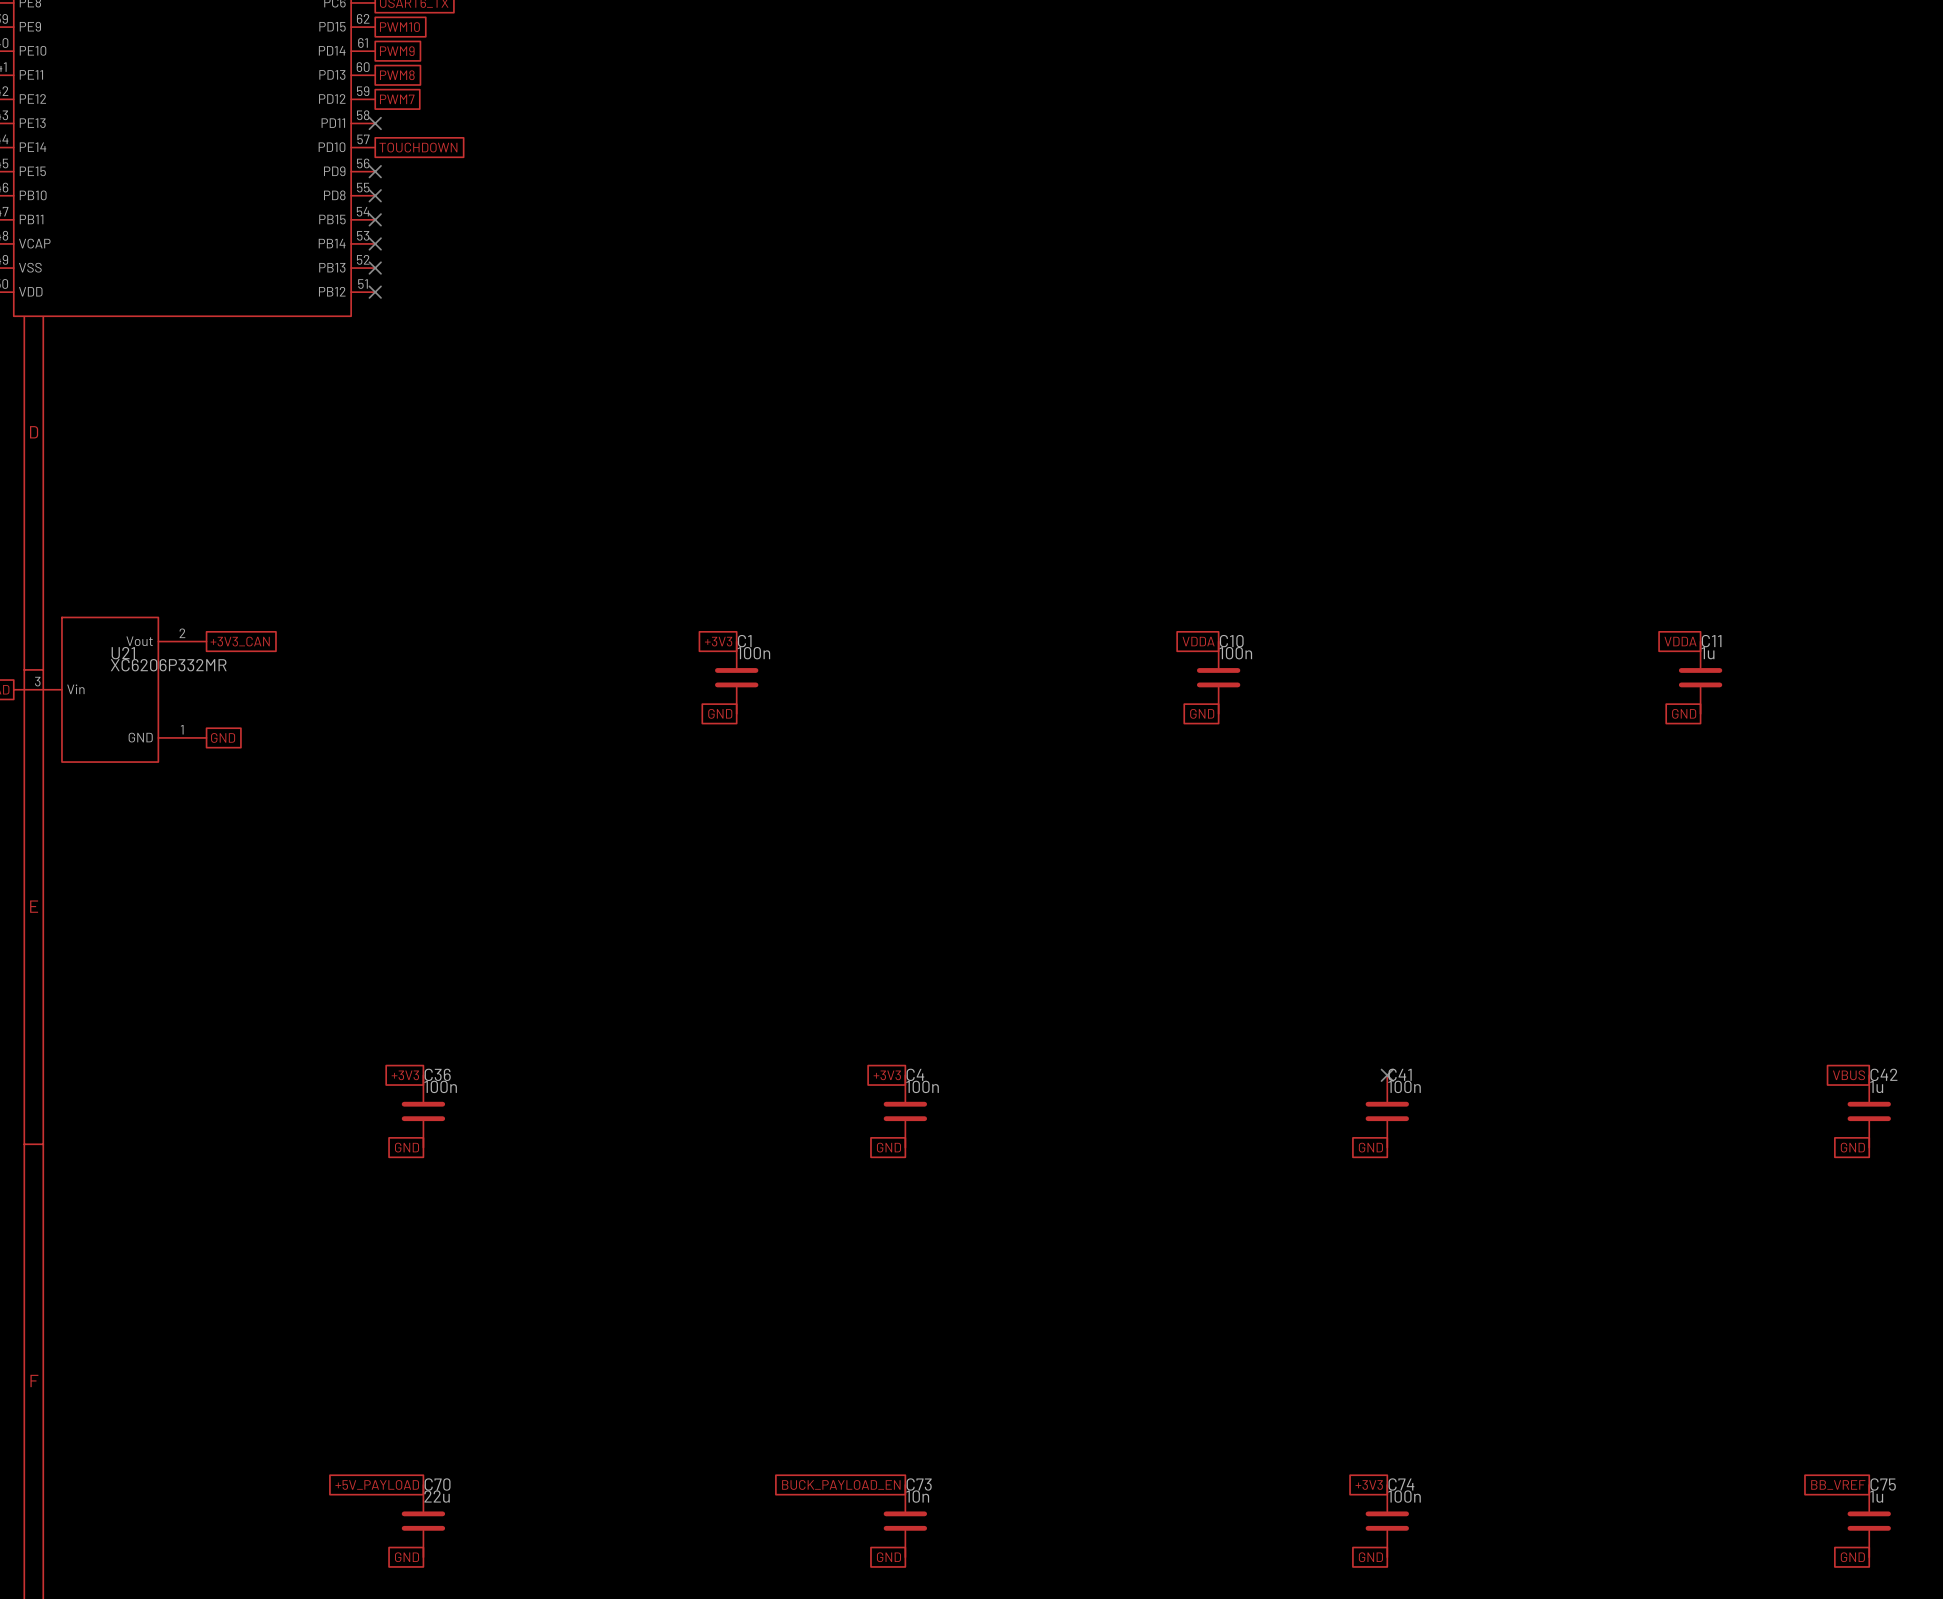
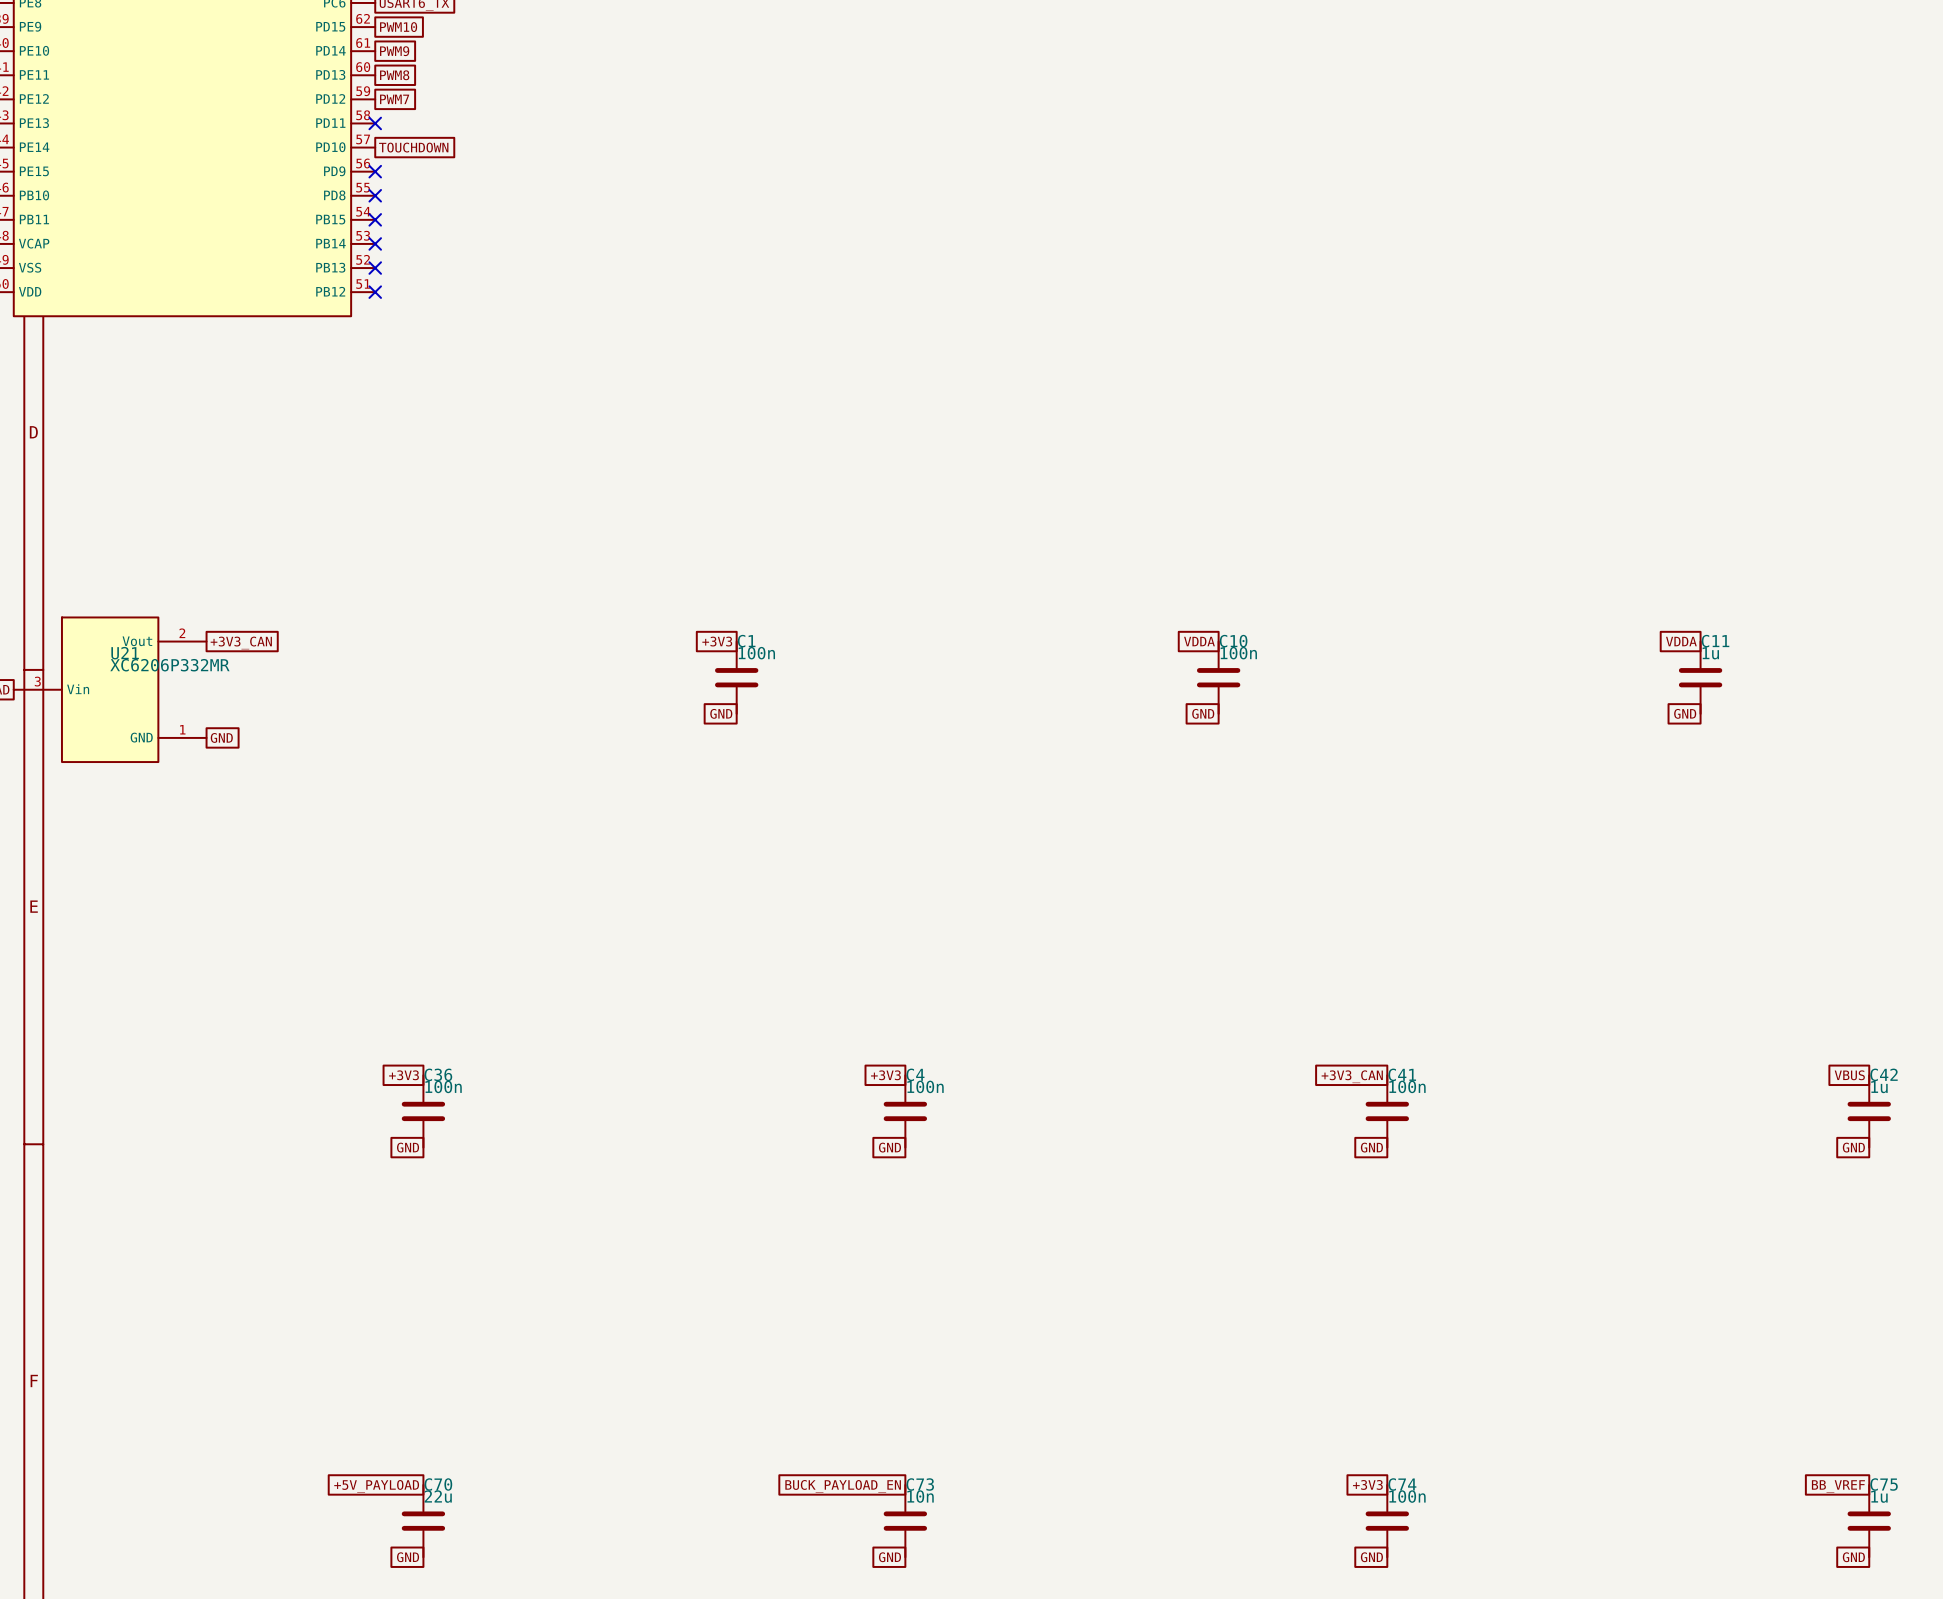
global label: none -> +3V3_CAN (1352, 1076)
no-connect mark: (1387, 1075) -> none

